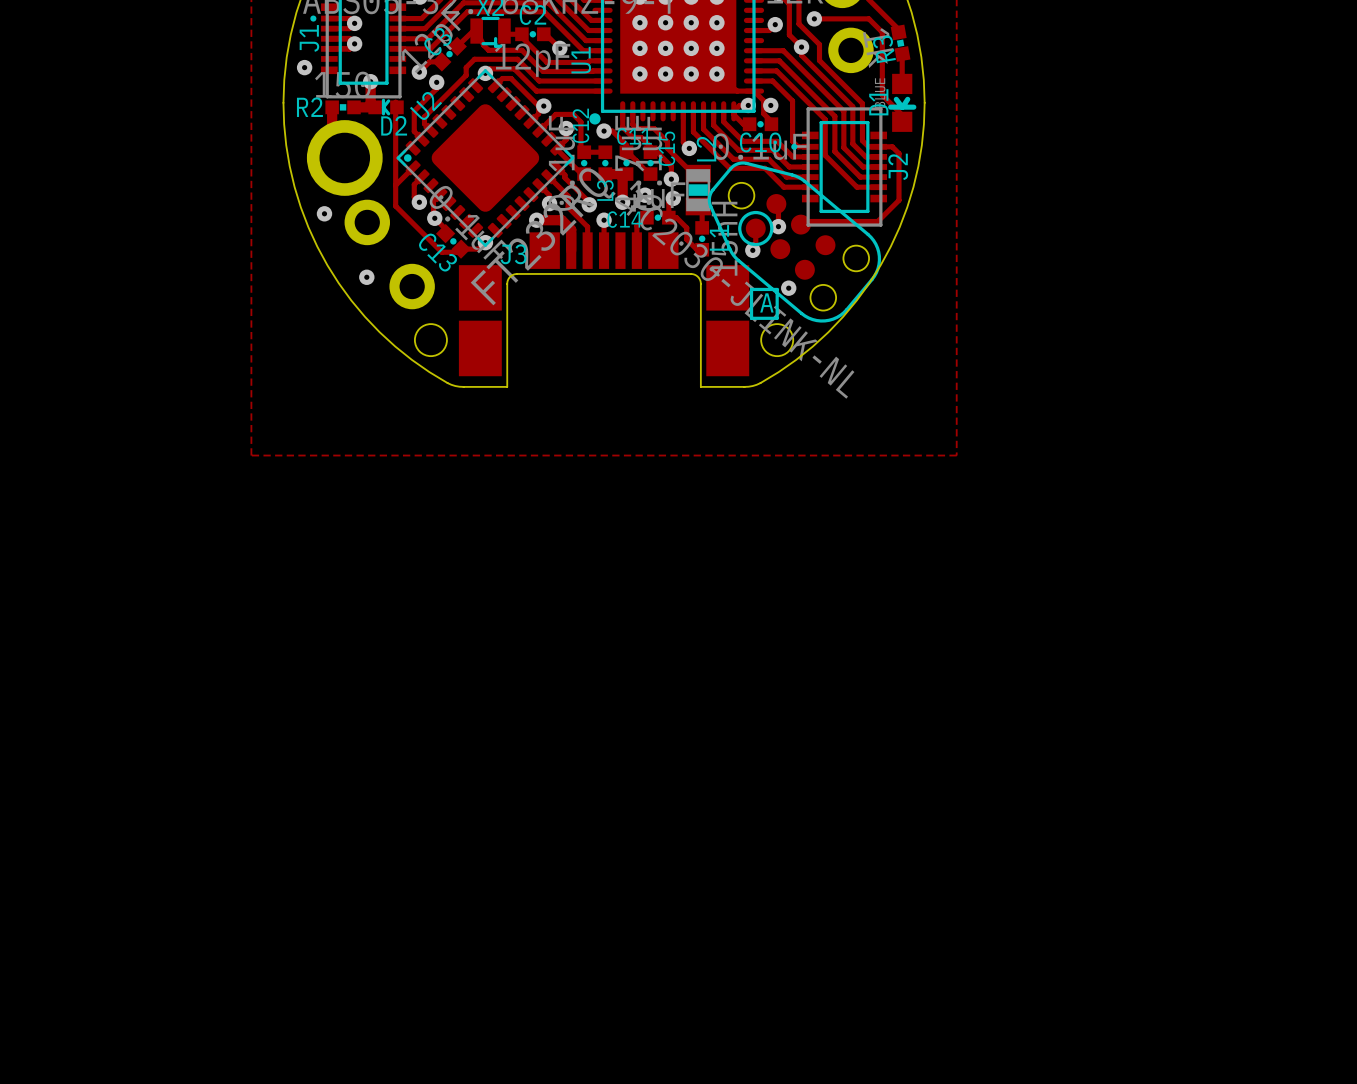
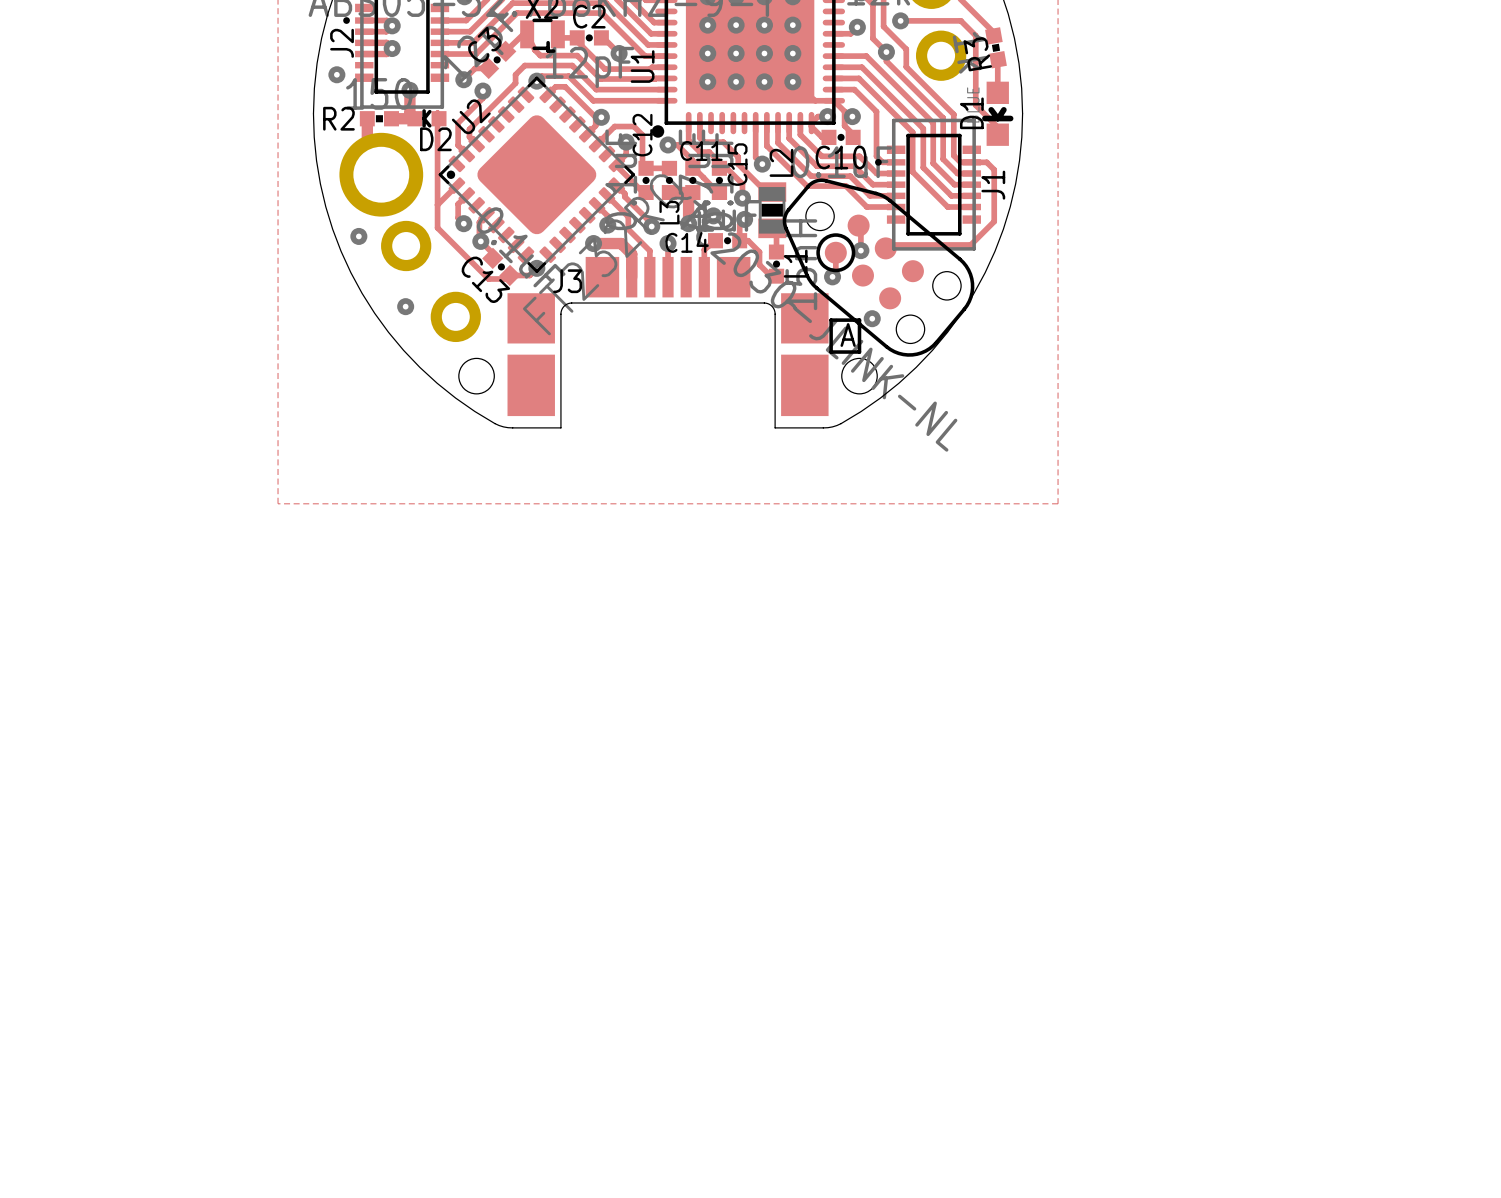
J1 name: J1 (309, 38) -> J2 (342, 43)
J2 name: J2 (898, 166) -> J1 (993, 185)

